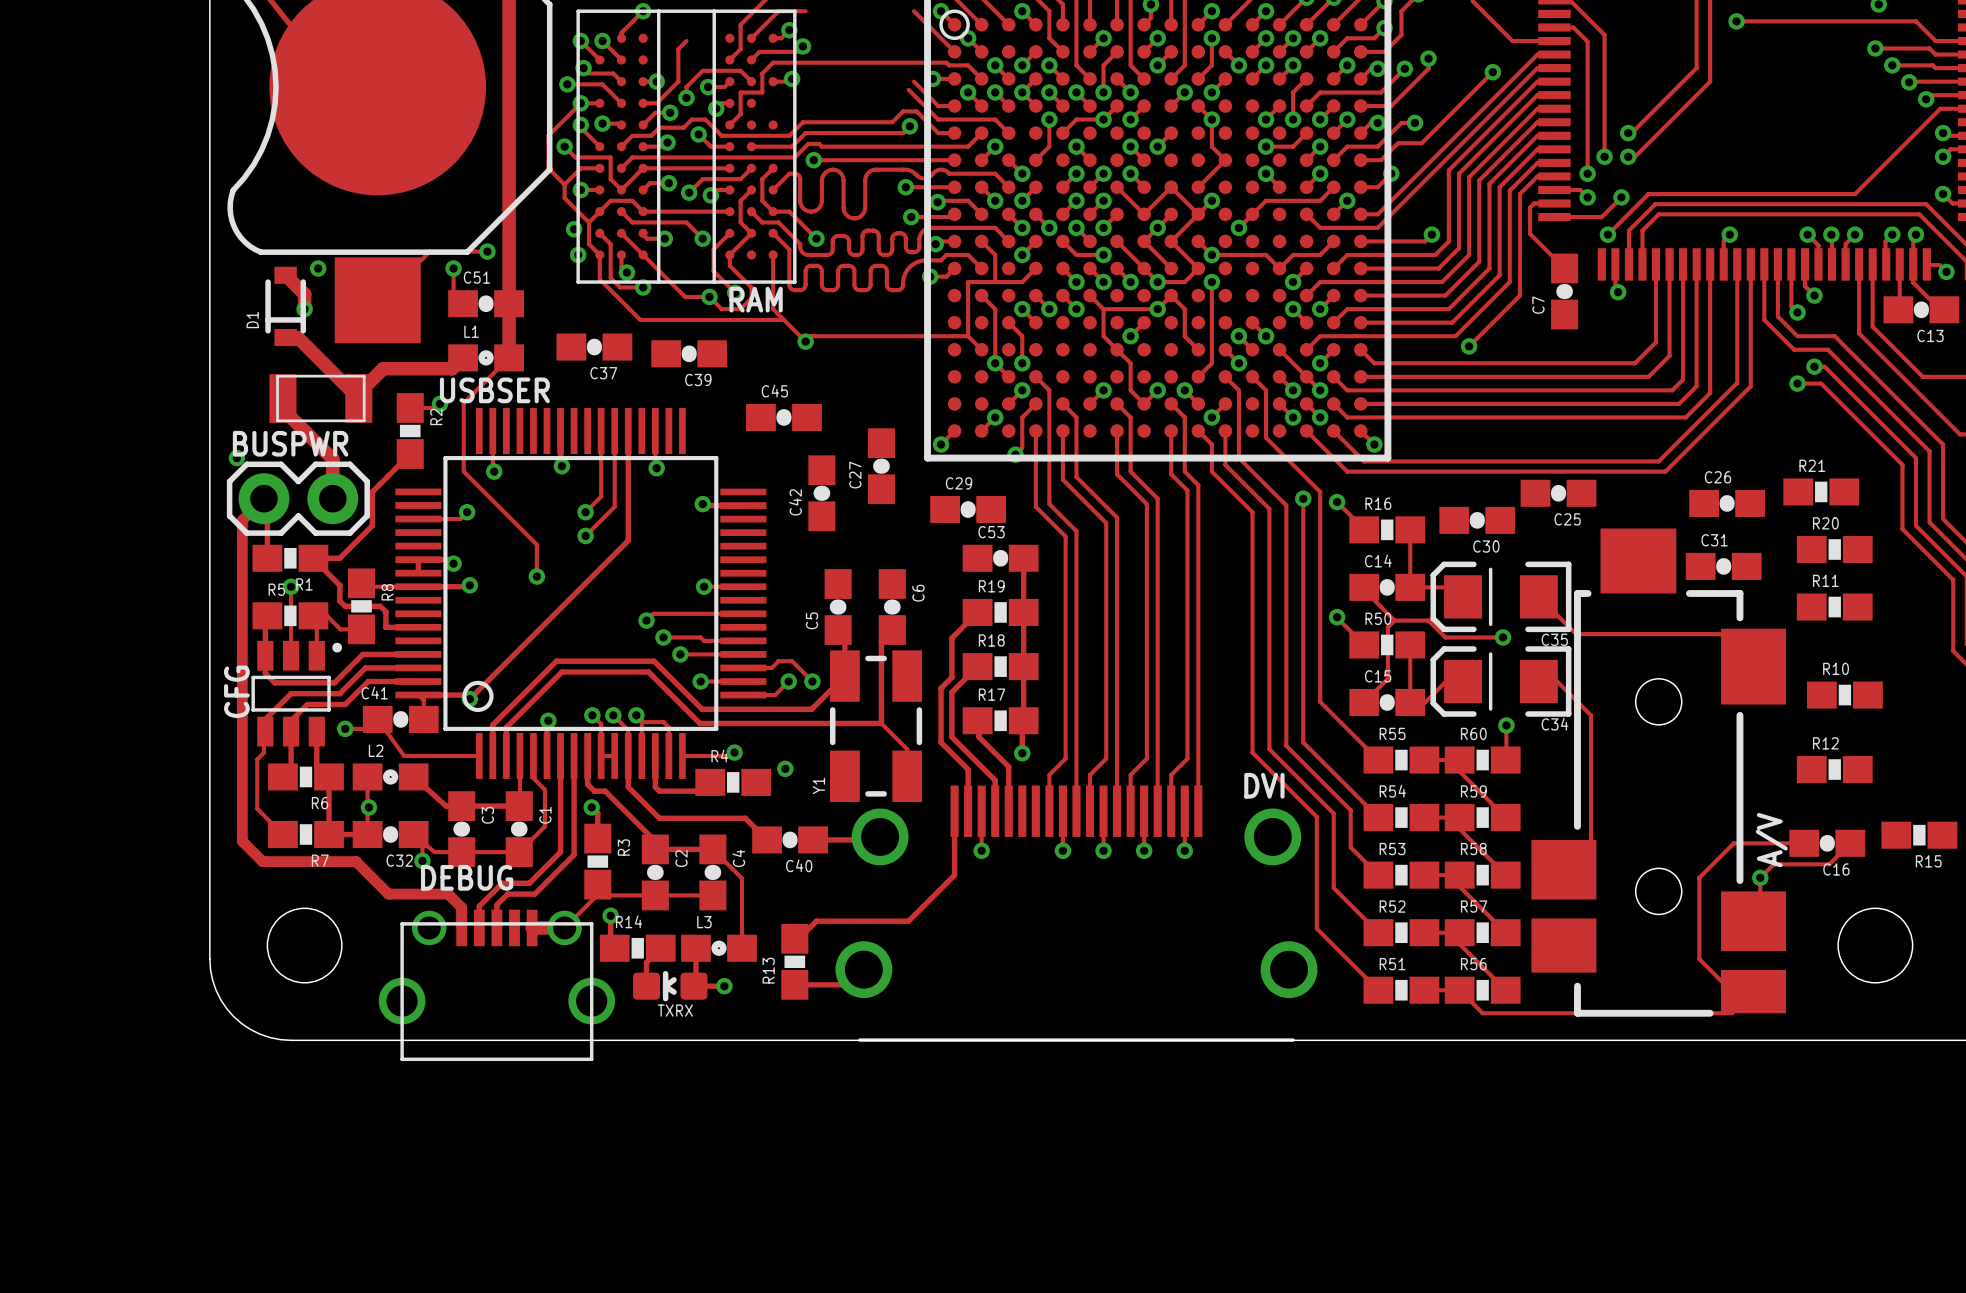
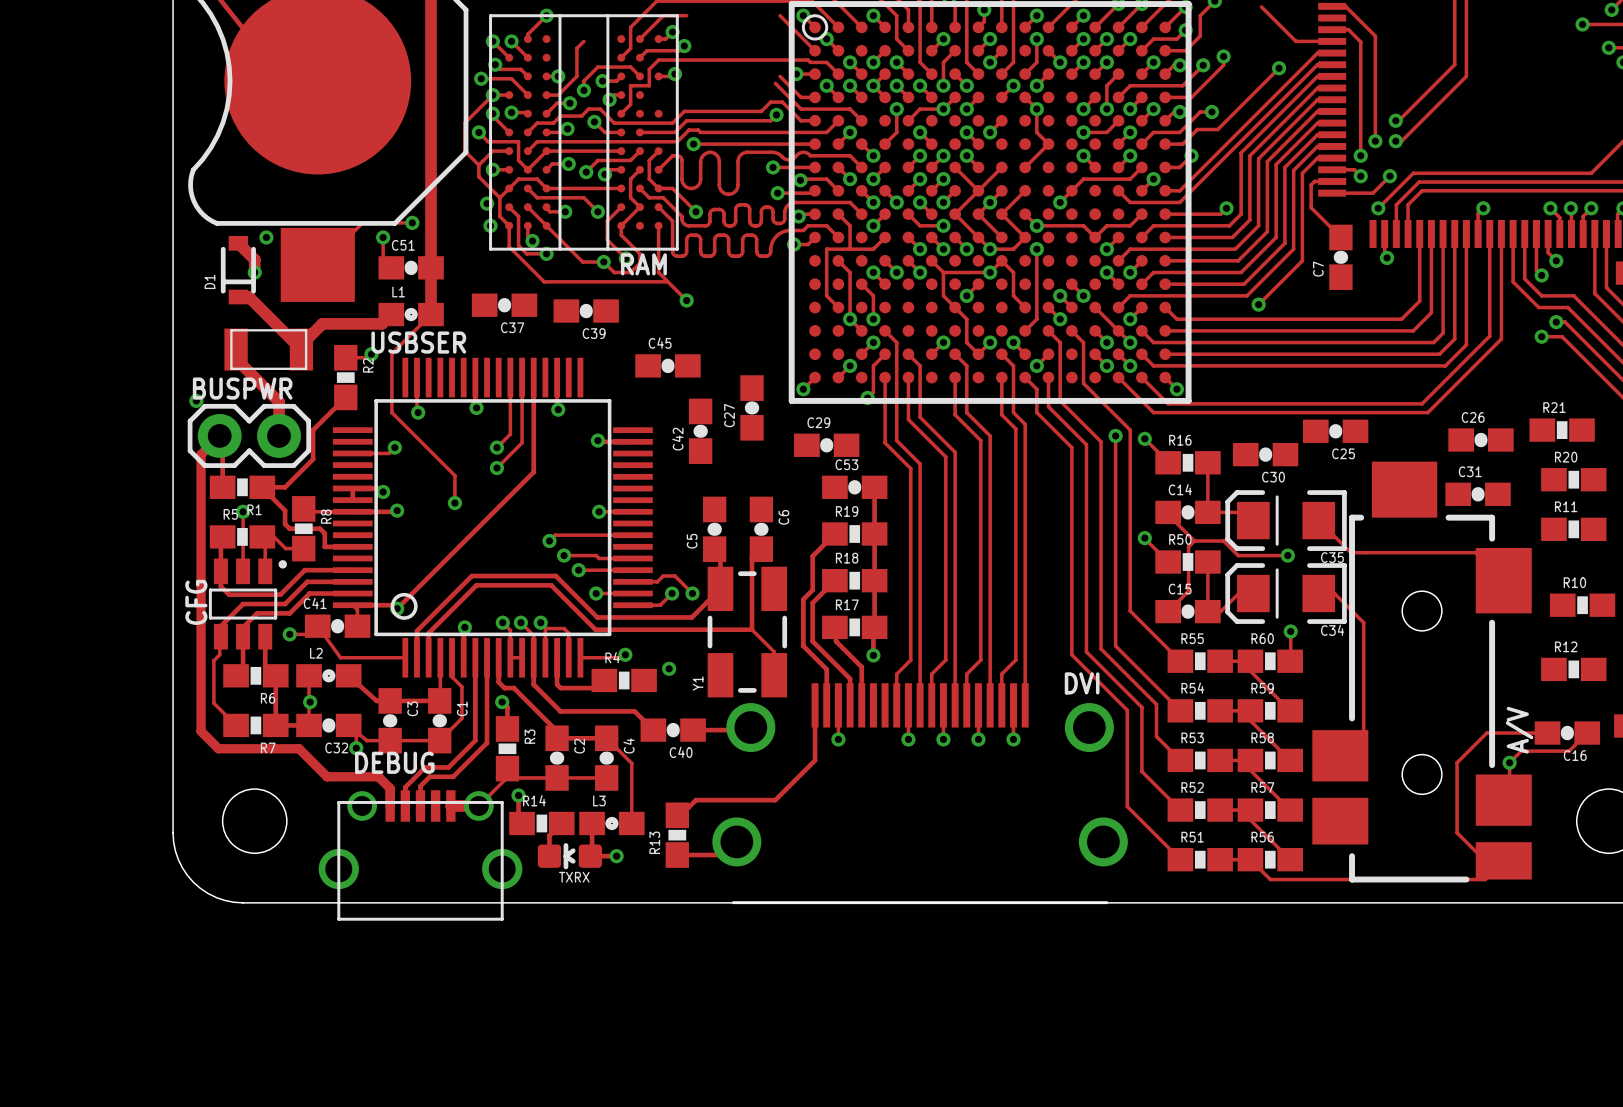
track: (1736, 21) (1844, 21) -> none
via position: (1736, 21) -> (1582, 24)
track: (1171, 187) (1198, 214) (1211, 200) -> none
via: (1211, 200) -> none
track: none -> (978, 190) (955, 214)
track: (968, 336) (811, 336) (805, 341) -> none

